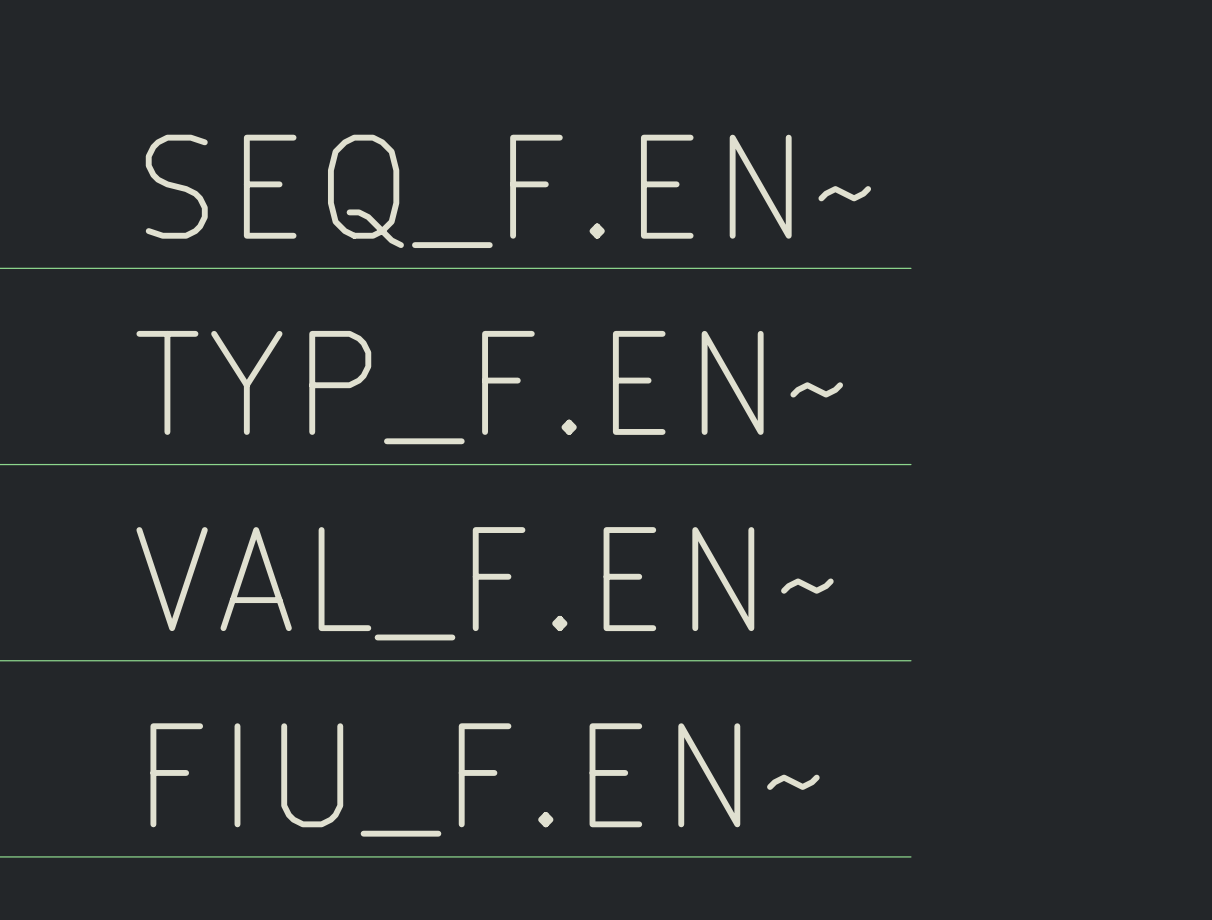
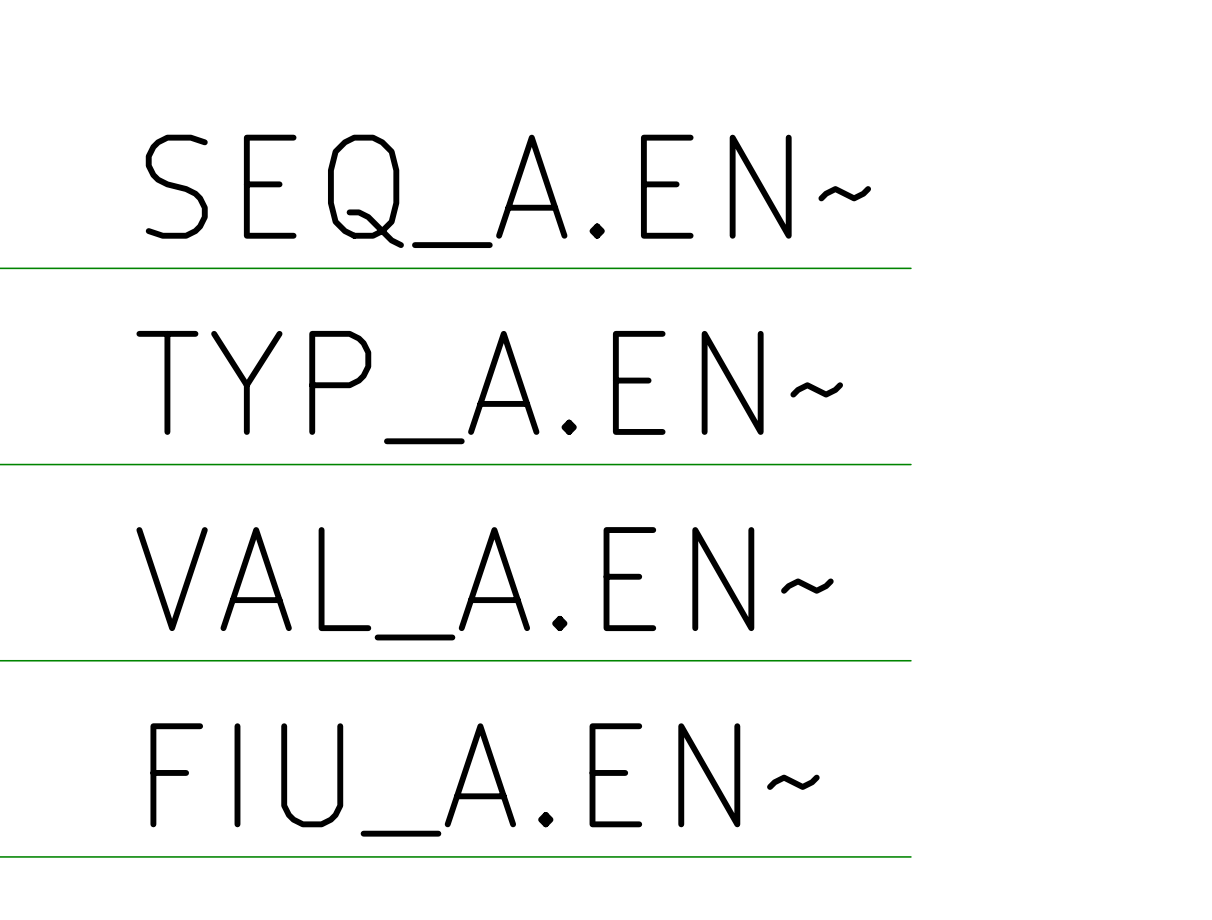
label: SEQ_F.EN~ (508, 191) -> SEQ_A.EN~ (508, 191)
label: TYP_F.EN~ (489, 387) -> TYP_A.EN~ (489, 387)
label: VAL_F.EN~ (485, 583) -> VAL_A.EN~ (485, 583)
label: FIU_F.EN~ (485, 779) -> FIU_A.EN~ (485, 779)

